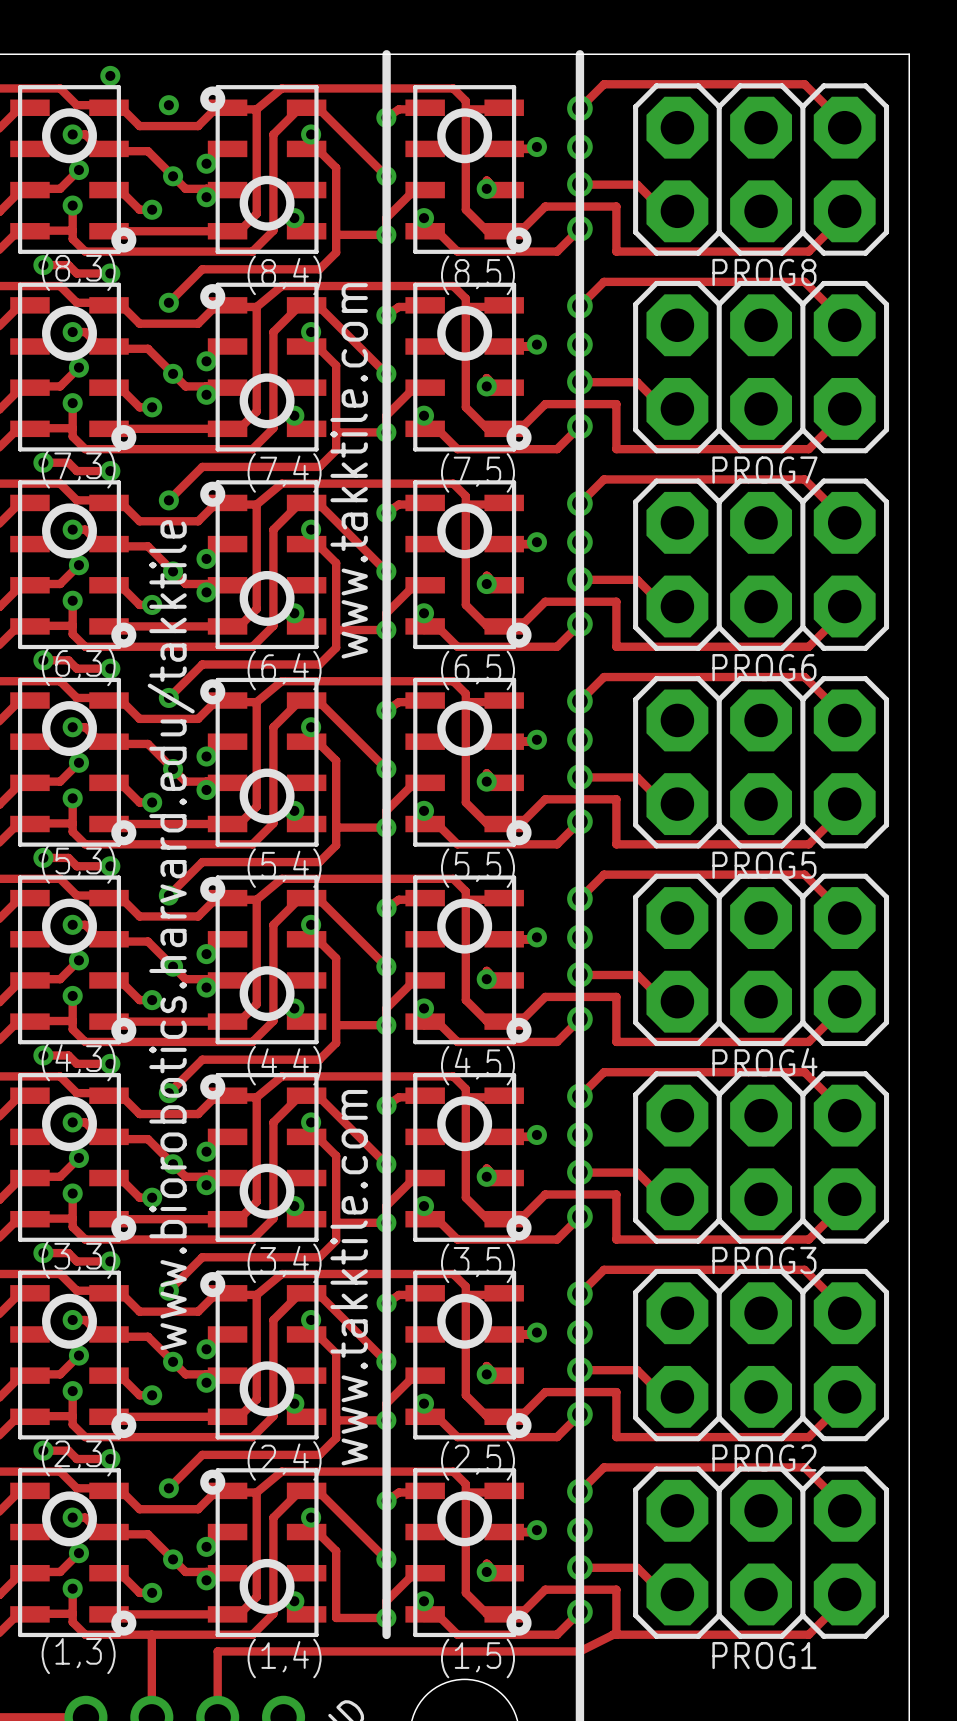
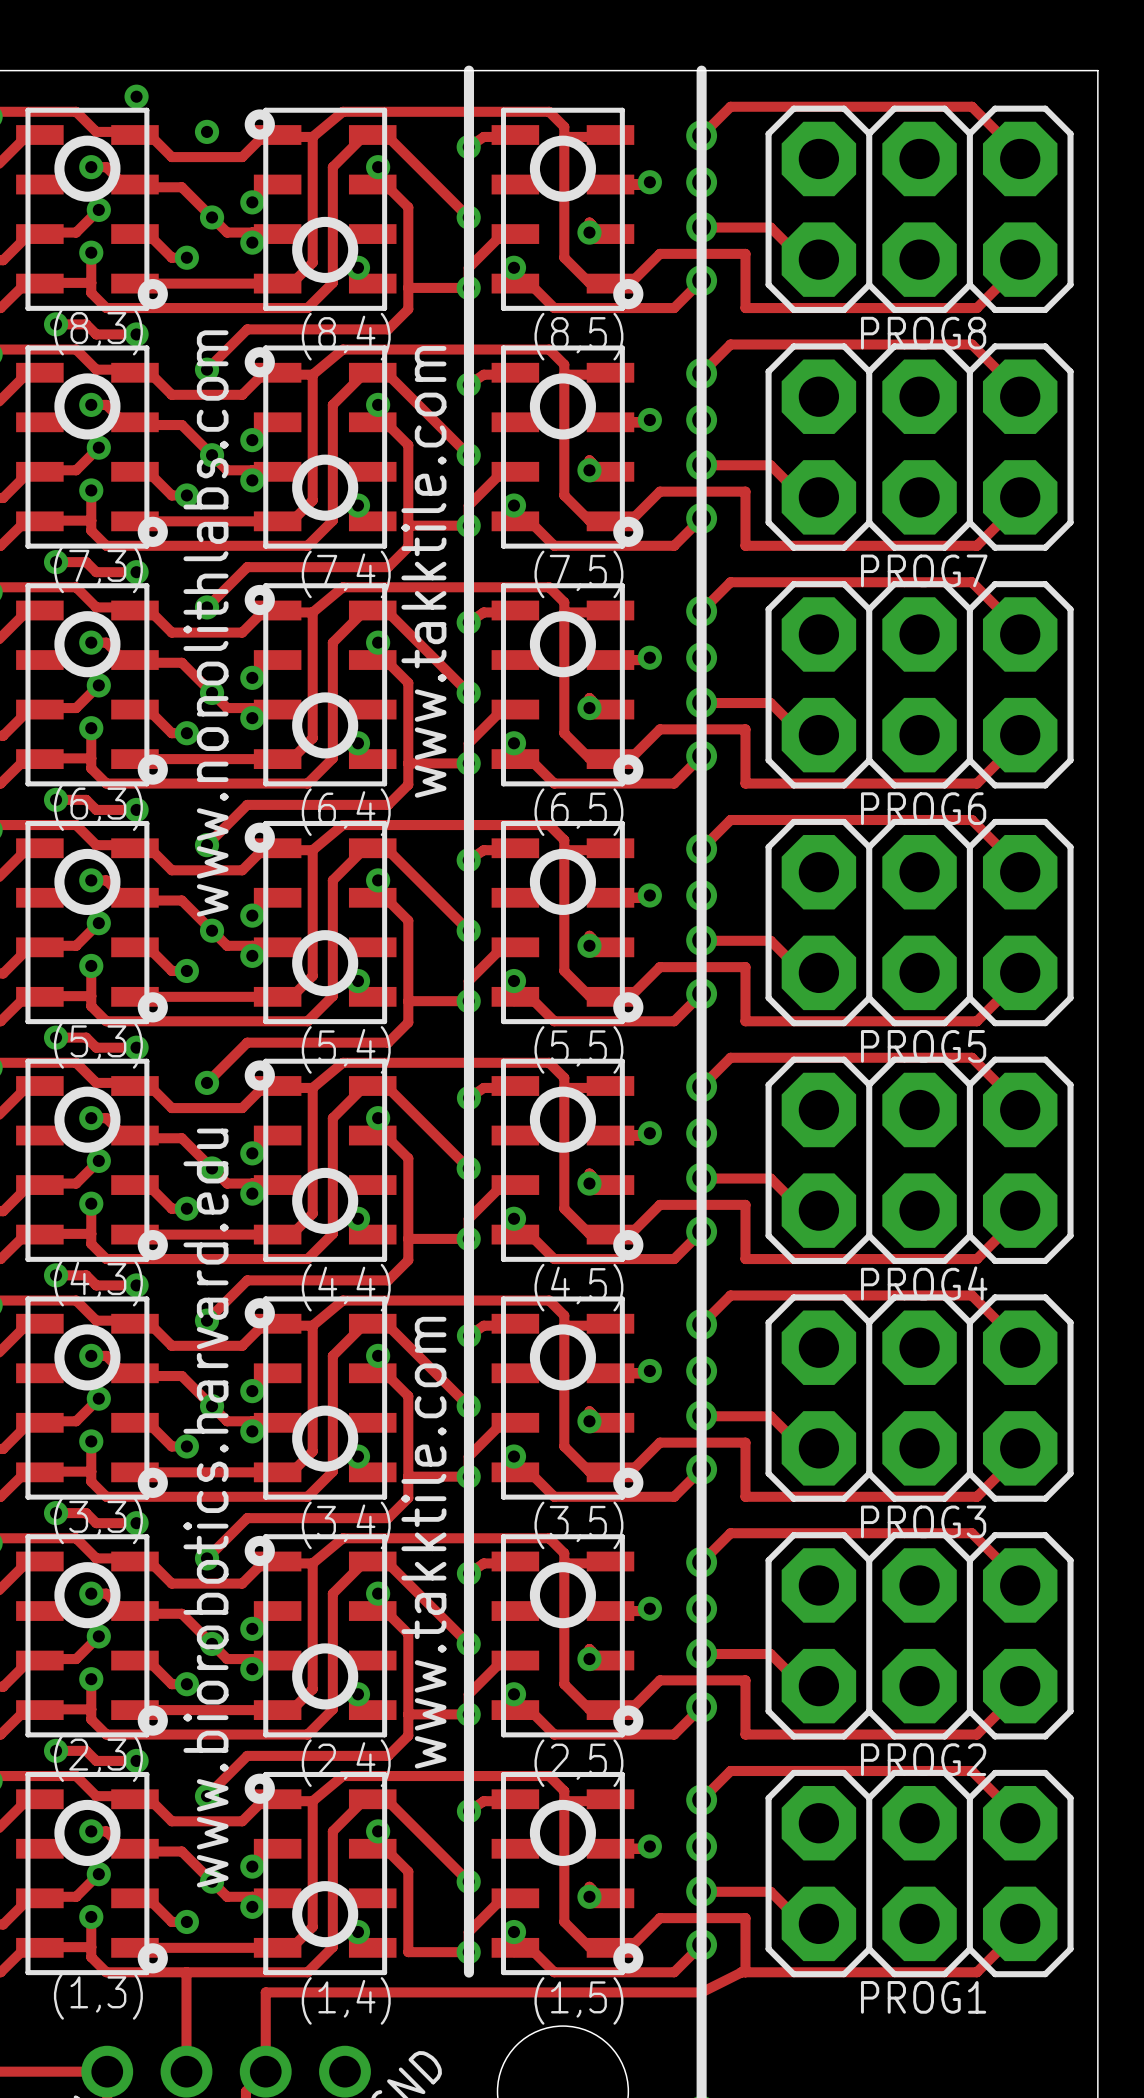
text: none -> www.nonolithlabs.com (205, 623)
text: www.biorobotics.harvard.edu/takktile (171, 935) -> www.biorobotics.harvard.edu (205, 1508)

